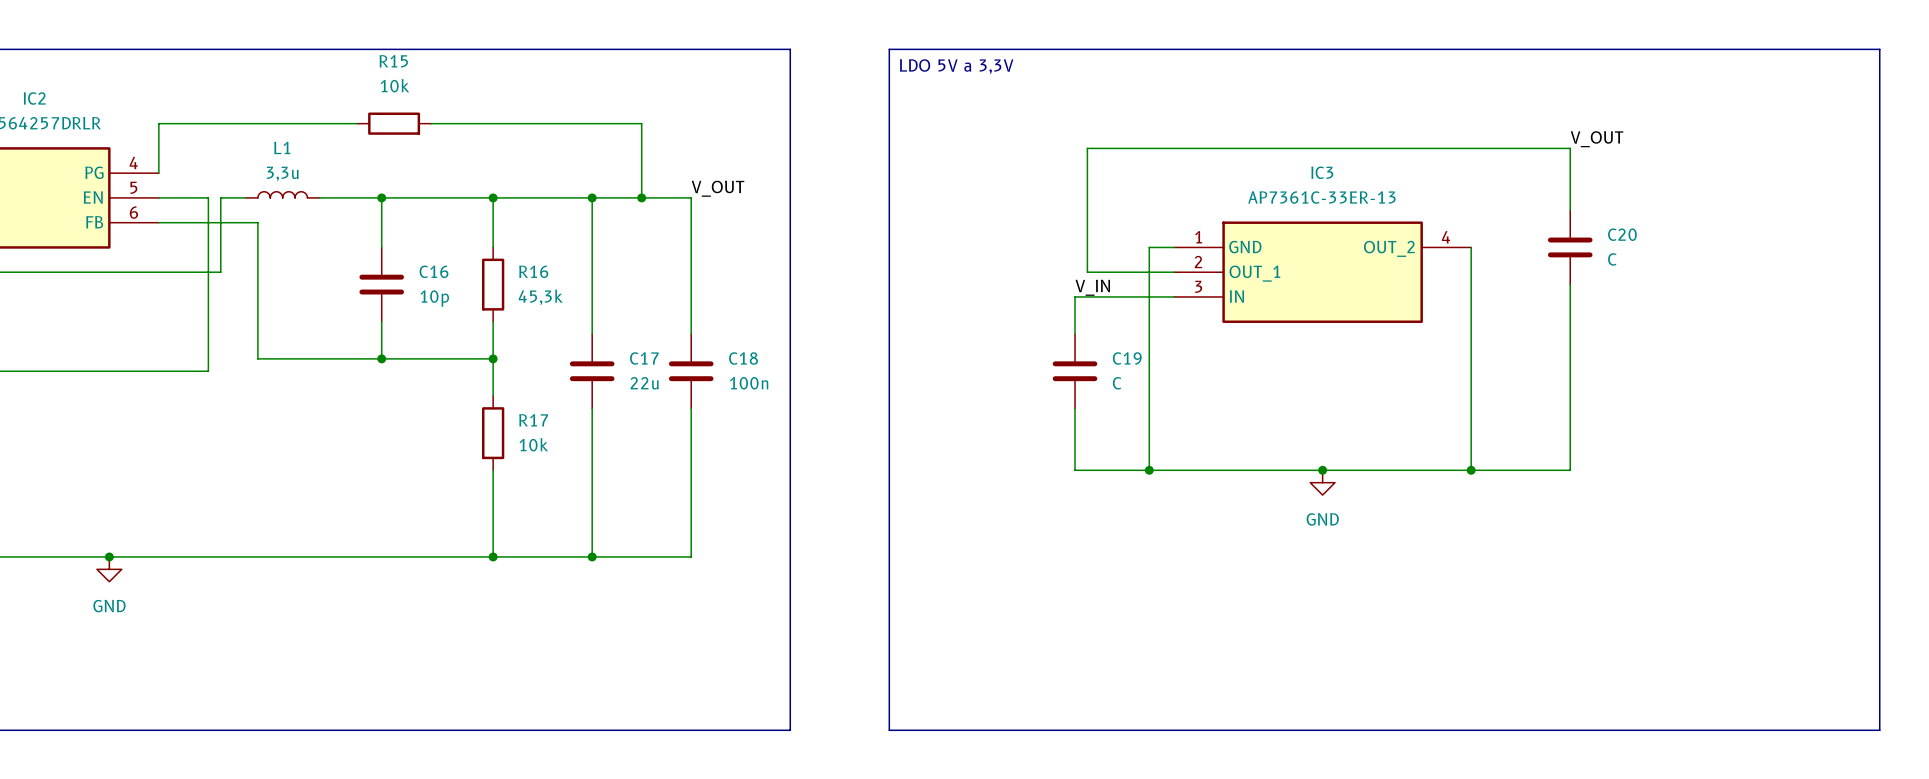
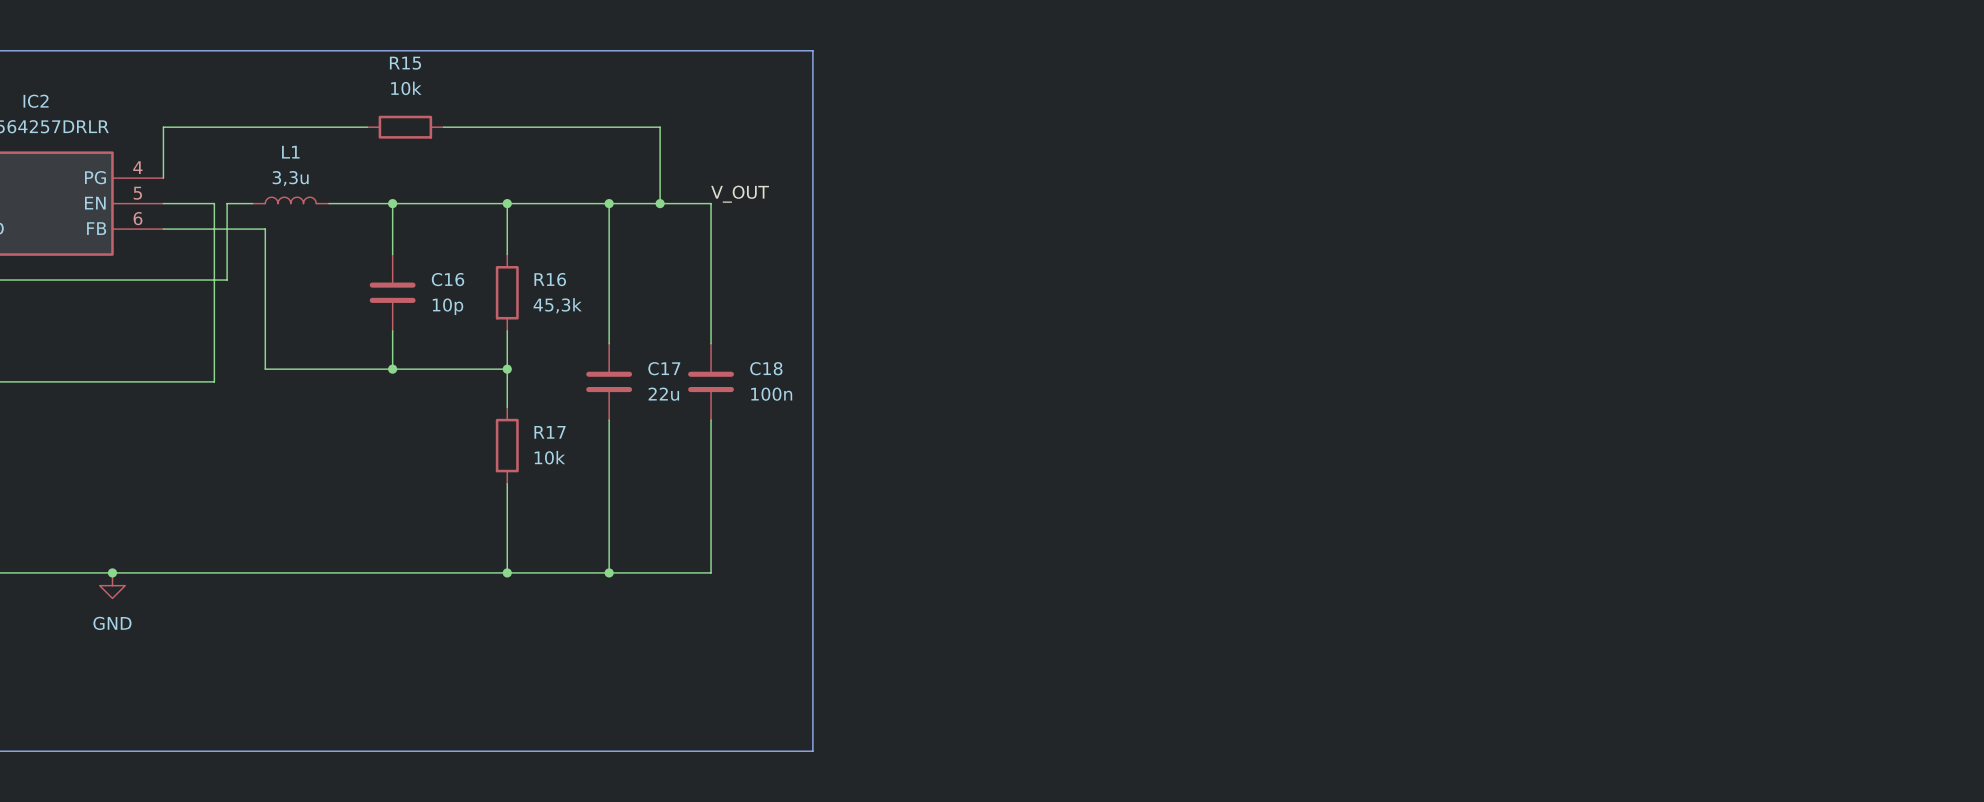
line: (889, 49) (1879, 49) (1879, 730) (889, 730) (889, 49) -> none
text: LDO 5V a 3,3V (956, 66) -> none
label: V_OUT (1597, 139) -> none
wire: (1570, 210) (1570, 148) (1087, 148) (1087, 272) (1174, 272) -> none
wire: (1174, 247) (1149, 247) (1149, 470) -> none
wire: (1471, 247) (1471, 470) -> none
C20: C (1570, 247) -> none
IC3: AP7361C-33ER-13 (1322, 272) -> none
wire: (1570, 284) (1570, 470) (1075, 470) (1075, 408) -> none
label: V_IN (1092, 287) -> none
wire: (1174, 296) (1075, 296) (1075, 334) -> none
C19: C (1075, 371) -> none
junction: (1149, 470) -> none
junction: (1322, 470) -> none
junction: (1471, 470) -> none
power symbol: GND (1322, 482) -> none

